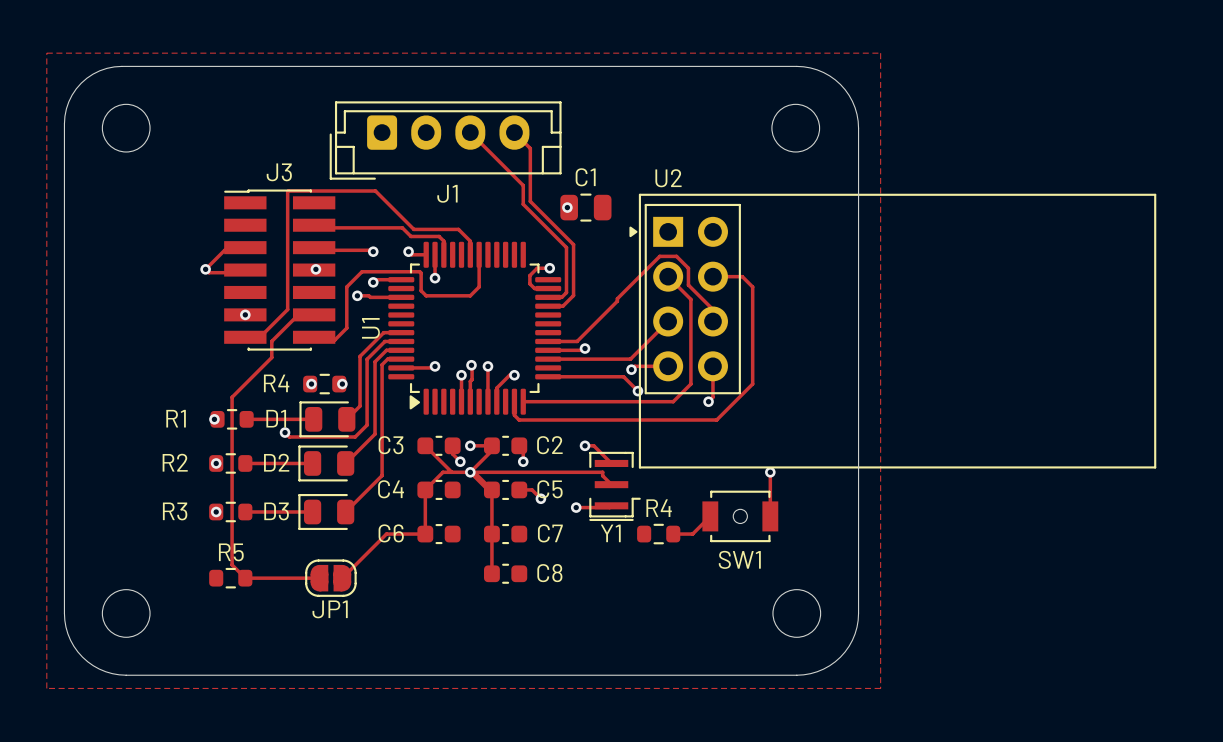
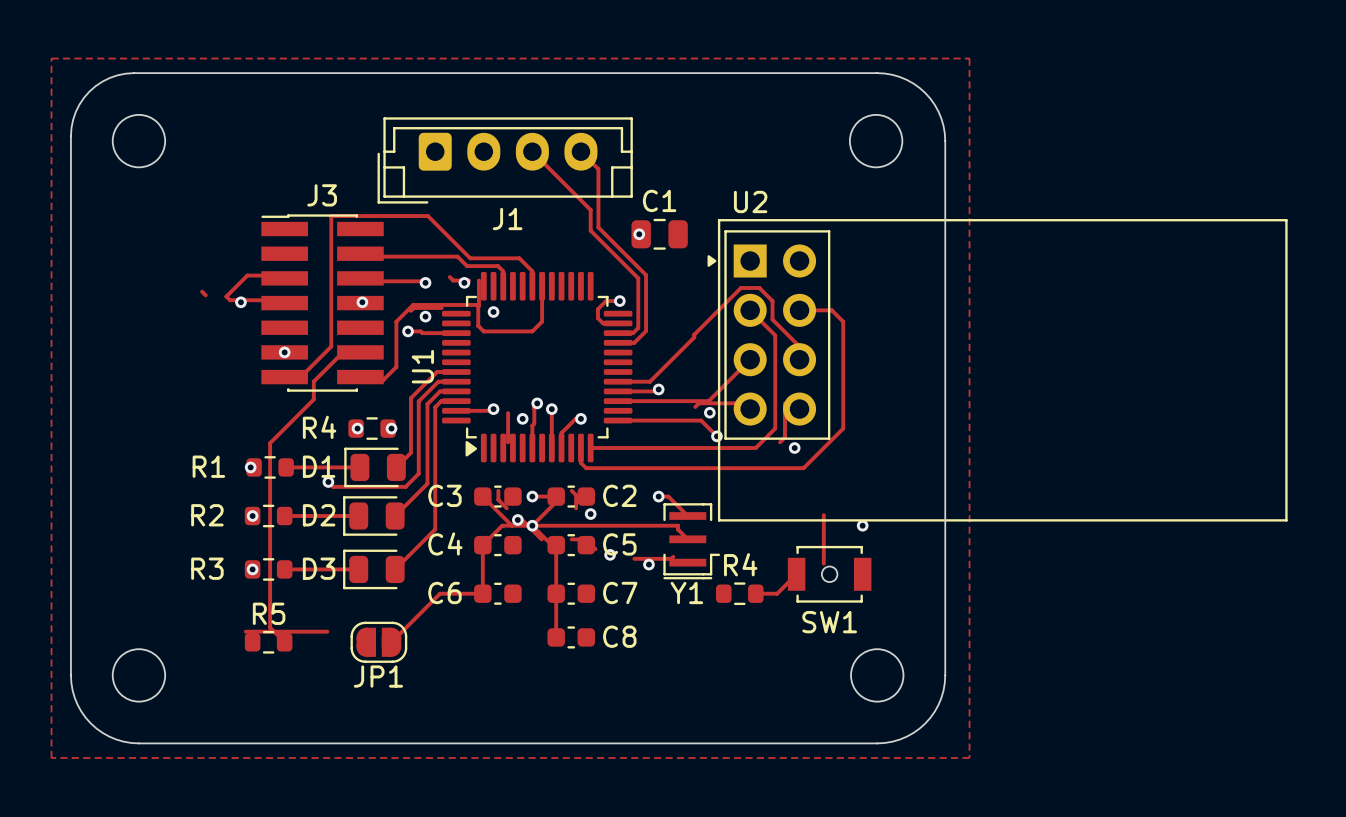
track: (470, 132) (523, 185) (523, 204) (566, 247) (566, 292) (561, 297) (548, 297) -> (532, 151) (590, 210) (590, 230) (638, 278) (638, 327) (633, 333) (618, 333)
track: (514, 132) (530, 148) (530, 201) (573, 244) (573, 295) (562, 306) (548, 306) -> (580, 151) (598, 169) (598, 227) (646, 275) (646, 331) (634, 342) (618, 342)
J1 position: (445, 140) -> (505, 160)
via position: (567, 207) -> (639, 234)
C1 position: (585, 207) -> (659, 234)
track: (320, 227) (402, 227) (410, 236) (439, 236) (443, 241) (443, 254) -> (367, 256) (457, 256) (467, 266) (498, 266) (503, 271) (503, 286)
track: (320, 250) (373, 251) -> (367, 281) (423, 281) (425, 282)
via: (373, 251) -> none
via: (408, 251) -> none
track: (470, 254) (470, 241) (458, 229) (413, 229) (375, 190) (288, 190) (287, 309) (259, 337) (245, 337) -> (532, 286) (532, 271) (519, 258) (470, 258) (427, 216) (332, 216) (331, 346) (300, 377) (284, 377)
track: (479, 254) (479, 286) (470, 295) (426, 295) (421, 290) (419, 271) (362, 271) (346, 286) (346, 328) (334, 339) (320, 339) -> (542, 286) (542, 321) (532, 331) (483, 331) (478, 325) (476, 304) (413, 304) (396, 321) (396, 366) (383, 380) (367, 380)
via: none -> (425, 282)
via: none -> (464, 282)
track: none -> (202, 291) (205, 295)
track: (549, 268) (537, 268) (529, 275) (529, 283) (534, 288) (548, 288) -> (619, 301) (606, 301) (597, 309) (597, 318) (603, 323) (618, 323)
via position: (549, 268) -> (619, 301)
via position: (205, 269) -> (240, 302)
via position: (315, 269) -> (362, 302)
J3 position: (279, 270) -> (322, 303)
track: (668, 276) (690, 299) (690, 384) (673, 401) (523, 401) -> (750, 310) (775, 335) (775, 428) (755, 448) (590, 448)
track: (712, 276) (742, 276) (752, 286) (752, 384) (716, 420) (519, 420) (514, 415) (514, 401) -> (799, 310) (831, 310) (843, 321) (843, 428) (803, 468) (586, 468) (580, 462) (580, 448)
via: (435, 278) -> none
via: (373, 282) -> none
via: none -> (493, 312)
via: none -> (425, 316)
track: (357, 295) (401, 297) -> (408, 331) (456, 333)
via: (357, 295) -> none
via: none -> (408, 331)
via position: (245, 314) -> (284, 352)
track: (314, 314) (298, 314) (271, 341) (271, 357) (232, 397) (232, 564) (245, 578) (319, 578) -> none
track: none -> (360, 352) (342, 352) (313, 381) (313, 399) (270, 443) (270, 627) (284, 642)
track: (668, 321) (630, 359) (548, 359) -> (750, 359) (708, 401) (618, 401)
track: (712, 321) (712, 309) (688, 285) (688, 268) (676, 256) (659, 256) (577, 341) (548, 341) -> (799, 359) (799, 346) (772, 319) (772, 301) (759, 288) (740, 288) (649, 381) (618, 381)
U1 position: (474, 328) -> (537, 367)
U2 position: (892, 331) -> (997, 370)
track: (401, 332) (383, 332) (360, 356) (360, 406) (346, 419) -> (456, 371) (437, 371) (410, 398) (410, 452) (396, 467)
track: (401, 341) (384, 341) (367, 359) (367, 425) (355, 436) (289, 436) (285, 432) -> (456, 381) (438, 381) (418, 401) (418, 473) (405, 486) (333, 486) (328, 482)
track: (585, 348) (583, 350) (548, 350) -> (658, 389) (656, 391) (618, 391)
via position: (585, 348) -> (658, 389)
track: (401, 350) (386, 350) (375, 361) (375, 434) (345, 463) -> (456, 391) (440, 391) (427, 404) (427, 483) (395, 516)
track: (401, 359) (387, 359) (382, 364) (382, 475) (345, 511) -> (456, 401) (441, 401) (435, 407) (435, 529) (395, 569)
track: (471, 365) (470, 401) -> (533, 407) (532, 448)
via: (471, 365) -> none
track: (435, 366) (401, 367) -> (493, 409) (491, 410) (456, 410)
via: (435, 366) -> none
track: (487, 366) (487, 401) -> (551, 409) (551, 448)
via: (631, 369) -> none
via: none -> (493, 409)
via: none -> (551, 409)
via: none -> (709, 412)
via: (461, 375) -> none
track: (514, 375) (509, 375) (496, 388) (496, 401) -> (580, 418) (575, 418) (561, 433) (561, 448)
via: (514, 375) -> none
track: (548, 376) (623, 376) (637, 391) -> (618, 420) (701, 420) (716, 436)
via: none -> (522, 418)
via: none -> (580, 418)
via: (311, 384) -> none
R4 position: (324, 384) -> (372, 428)
via: (342, 384) -> none
via: none -> (357, 428)
via: none -> (391, 428)
via: (637, 391) -> none
via: none -> (716, 436)
via position: (708, 401) -> (794, 448)
via position: (214, 419) -> (250, 467)
R1 position: (232, 419) -> (270, 467)
track: (246, 419) (313, 419) -> (286, 467) (359, 467)
D1 position: (327, 419) -> (375, 467)
via position: (285, 432) -> (328, 482)
track: (425, 445) (451, 472) -> (482, 496) (511, 525)
C3 position: (439, 445) -> (497, 496)
track: (470, 445) (491, 445) (491, 450) (470, 472) (491, 493) (491, 573) -> (532, 496) (556, 496) (556, 501) (532, 525) (556, 549) (556, 637)
via: (470, 445) -> none
C2 position: (505, 445) -> (571, 496)
track: (585, 445) (593, 445) (611, 463) -> (658, 496) (668, 496) (687, 516)
via position: (585, 445) -> (658, 496)
via: none -> (532, 496)
via: (460, 461) -> none
via position: (523, 461) -> (590, 514)
via position: (216, 463) -> (252, 516)
R2 position: (230, 463) -> (268, 516)
track: (245, 463) (312, 463) -> (284, 516) (358, 516)
D2 position: (326, 463) -> (373, 516)
track: (770, 472) (770, 516) -> (823, 515) (823, 563)
via position: (770, 472) -> (862, 525)
via: none -> (532, 525)
track: (611, 484) (602, 475) (602, 472) (442, 472) (425, 489) (425, 534) (386, 534) (342, 578) -> (687, 539) (678, 529) (678, 525) (502, 525) (482, 545) (482, 593) (440, 593) (391, 642)
Y1 position: (615, 486) -> (691, 541)
C4 position: (439, 489) -> (497, 545)
C5 position: (505, 489) -> (571, 545)
via: (540, 498) -> none
via: none -> (610, 554)
via: (576, 507) -> none
via position: (216, 511) -> (252, 569)
R3 position: (230, 511) -> (268, 569)
track: (245, 511) (312, 511) -> (284, 569) (358, 569)
D3 position: (326, 511) -> (373, 569)
via: none -> (648, 564)
track: (710, 516) (692, 534) (673, 534) -> (796, 574) (777, 593) (755, 593)
SW1 position: (740, 516) -> (829, 574)
C6 position: (439, 534) -> (497, 593)
C7 position: (505, 534) -> (571, 593)
R4 position: (658, 534) -> (739, 593)
track: none -> (245, 631) (327, 631)
C8 position: (505, 573) -> (571, 637)
R5 position: (230, 578) -> (268, 642)
JP1 position: (330, 578) -> (378, 642)

